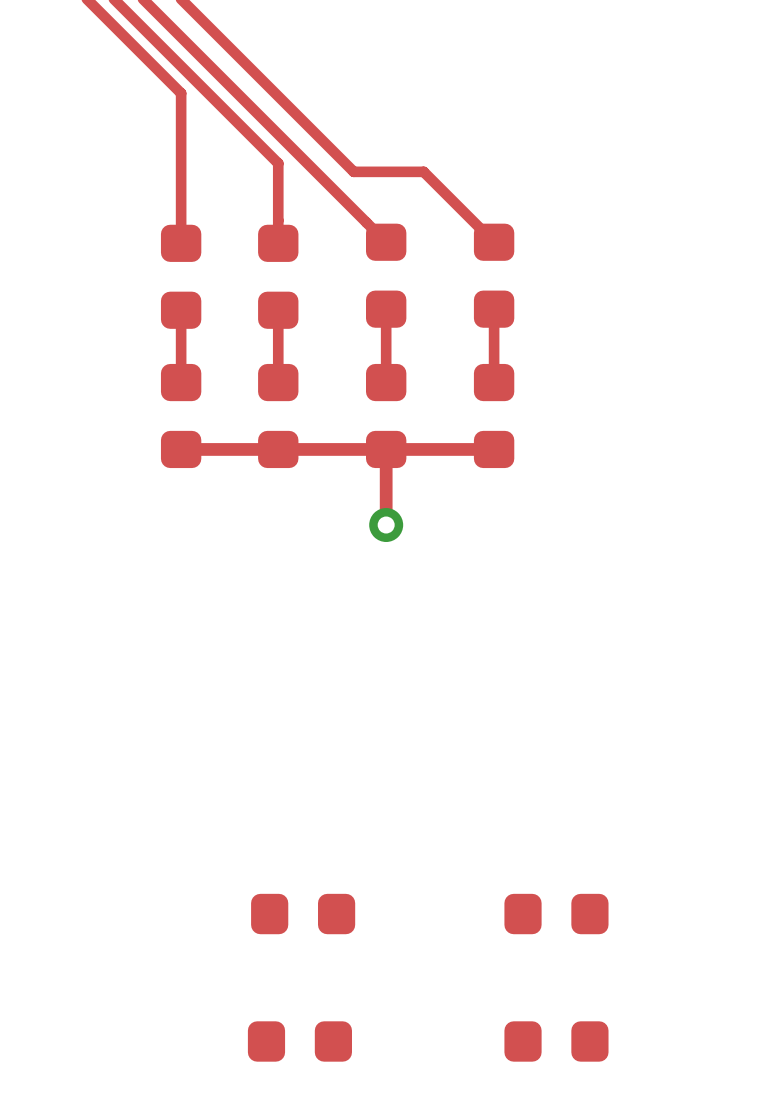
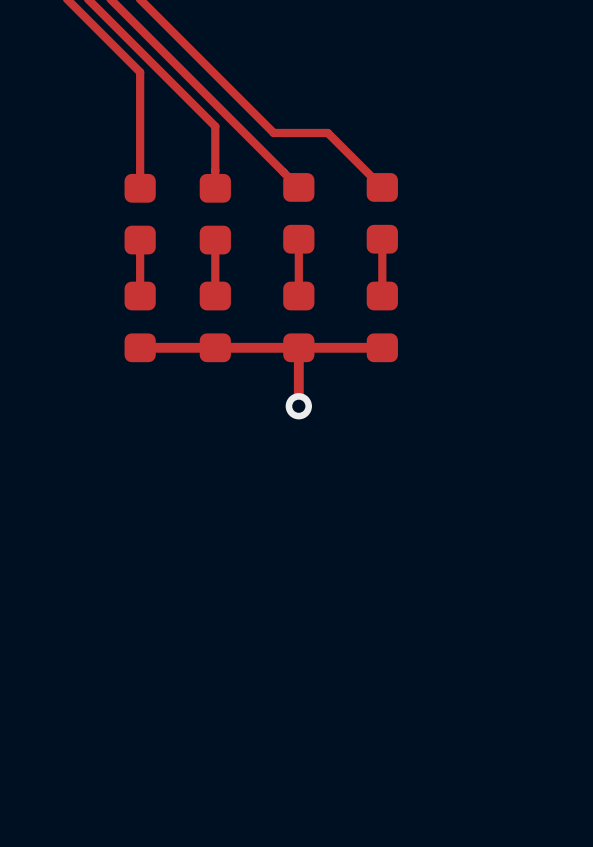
part: (303, 914) -> none
part: (556, 914) -> none
part: (299, 1041) -> none
part: (556, 1041) -> none

